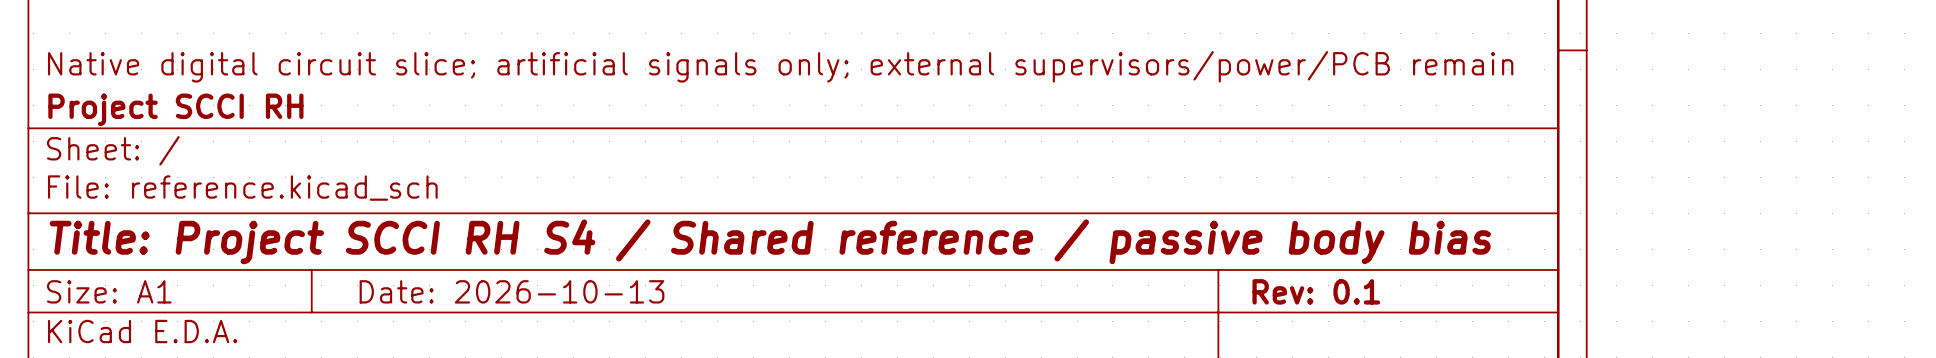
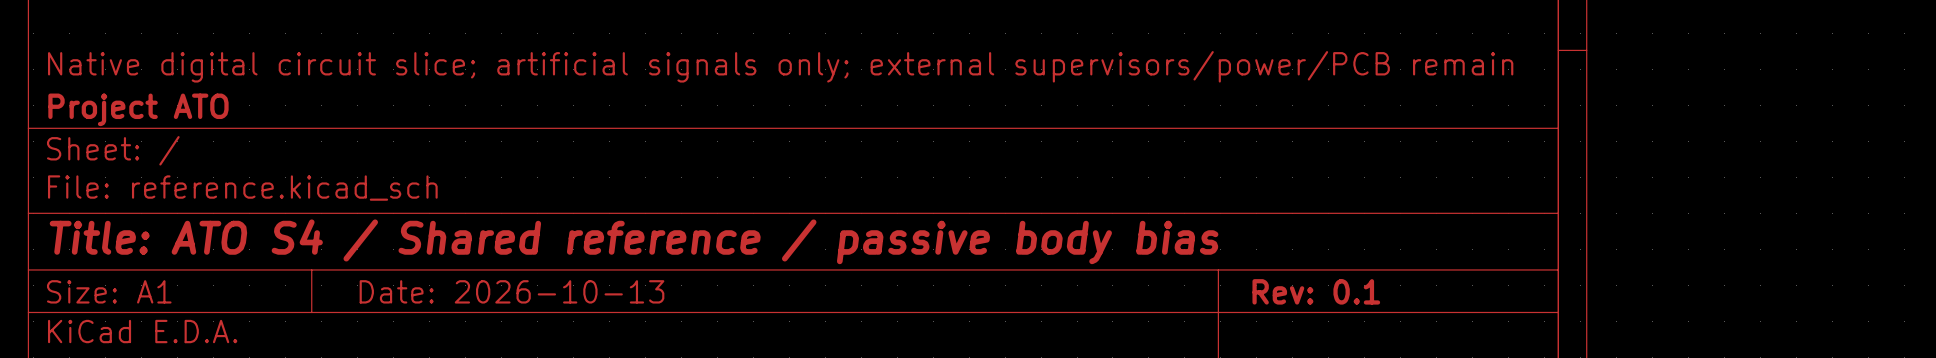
title block: Project SCCI RH (175, 109) -> Project ATO (138, 109)
title block: Title: Project SCCI RH S4 / Shared reference / passive body bias (770, 241) -> Title: ATO S4 / Shared reference / passive body bias (634, 241)

